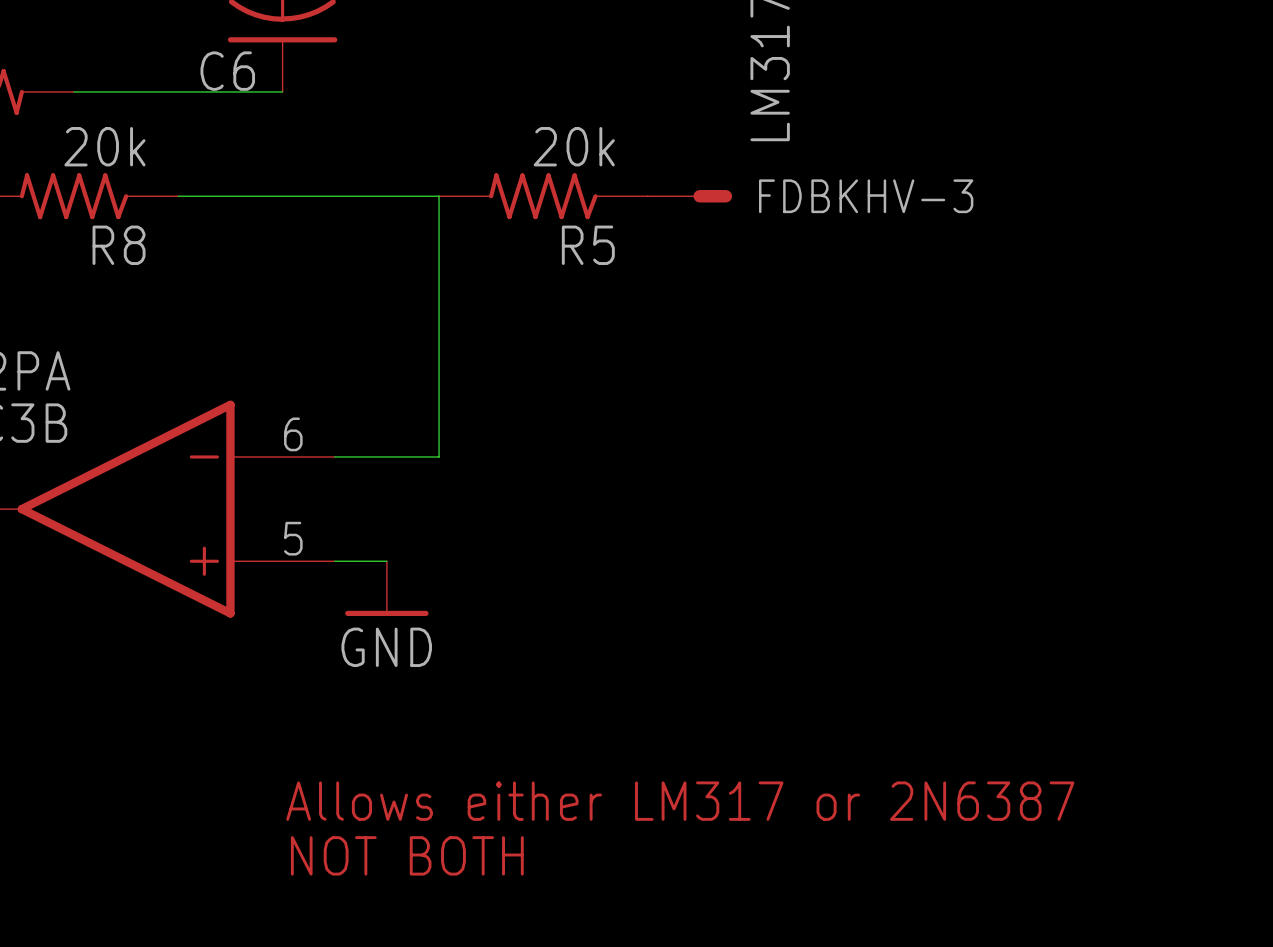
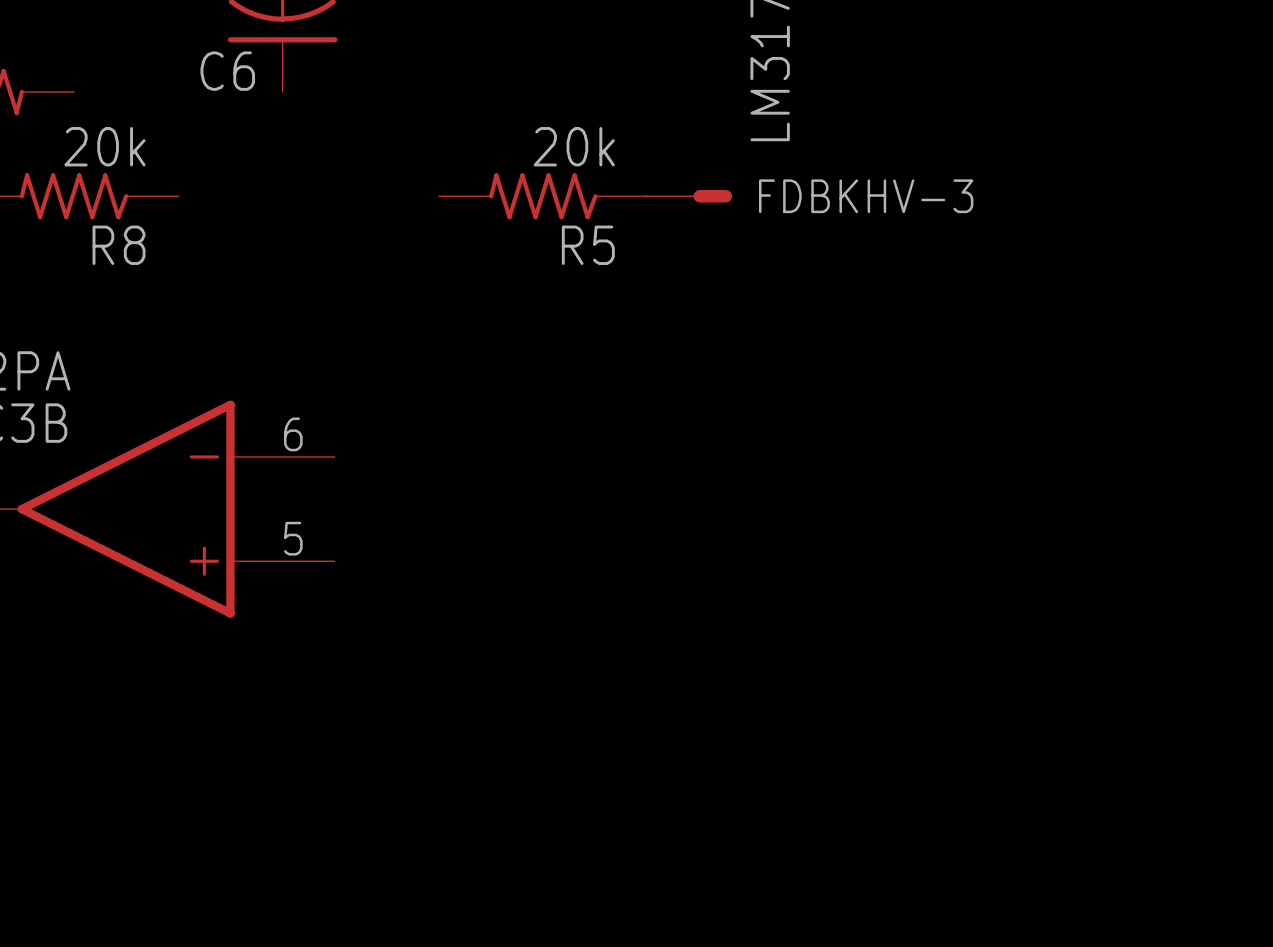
wire: (74, 91) (282, 91) -> none
wire: (178, 196) (439, 196) (439, 456) (334, 456) -> none
wire: (334, 561) (386, 561) -> none
power symbol: GND (386, 588) -> none
text: Allows either LM317 or 2N6387 (680, 801) -> none
text: NOT BOTH (407, 855) -> none

